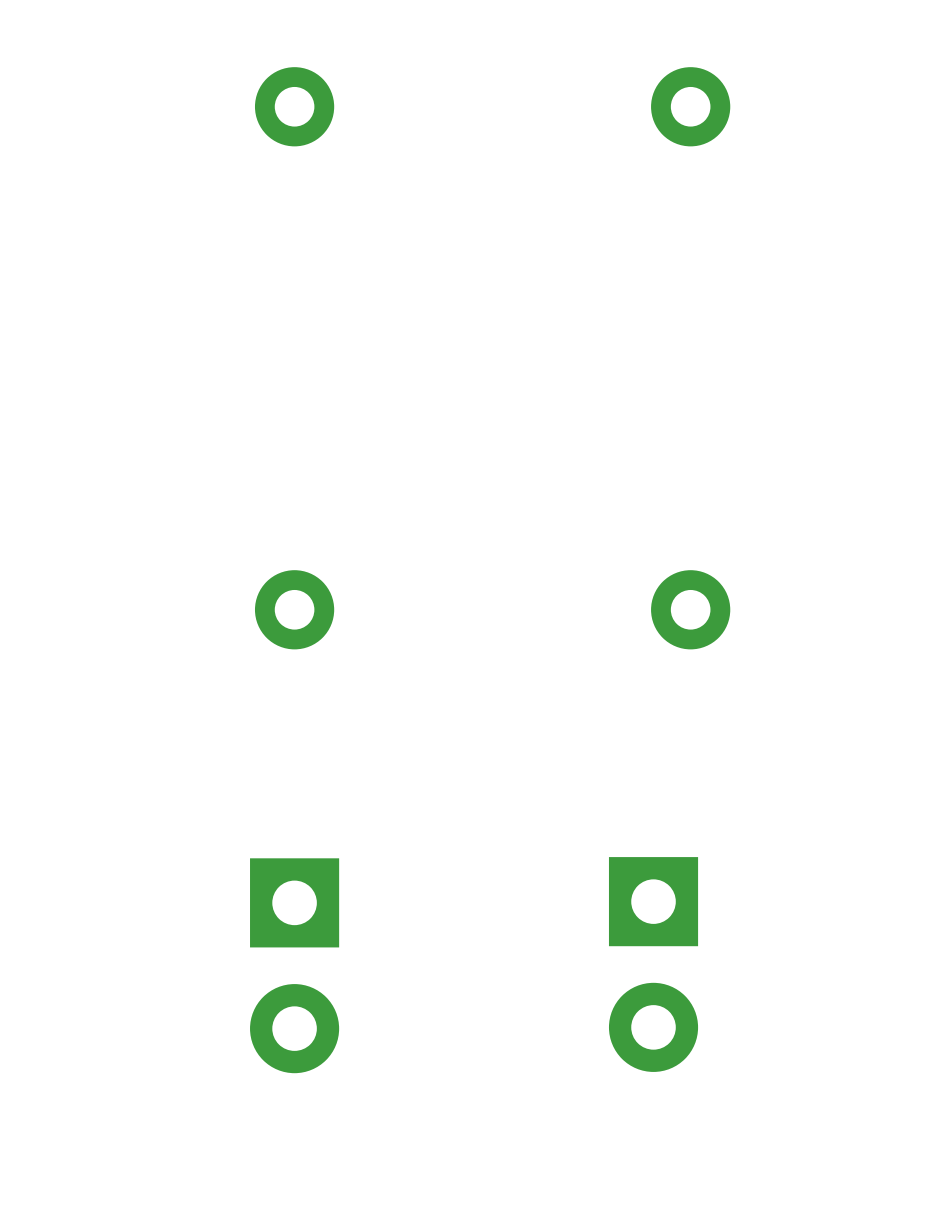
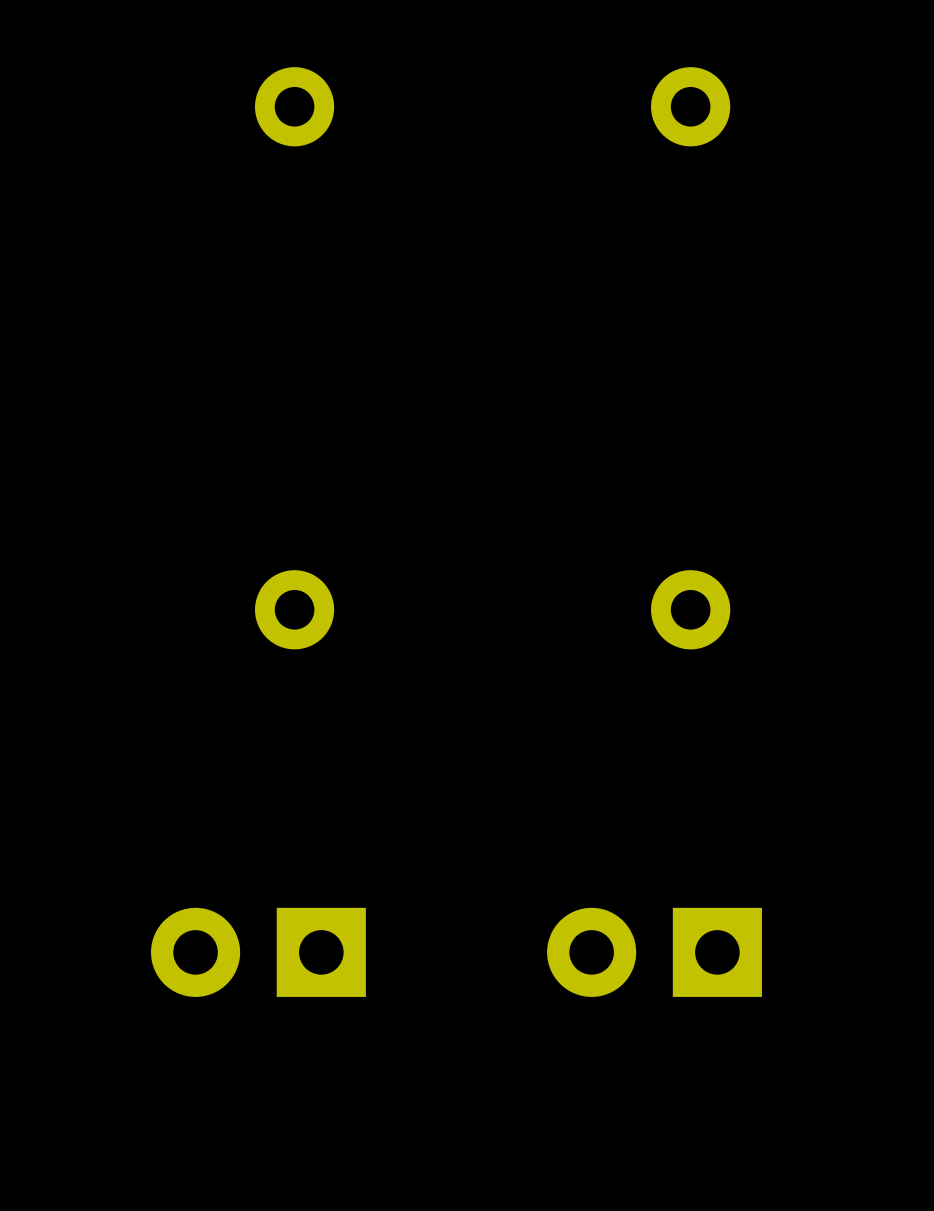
part rotation: 0° (653, 964) -> 90° clockwise (654, 952)
part rotation: 0° (294, 965) -> 90° clockwise (258, 952)

